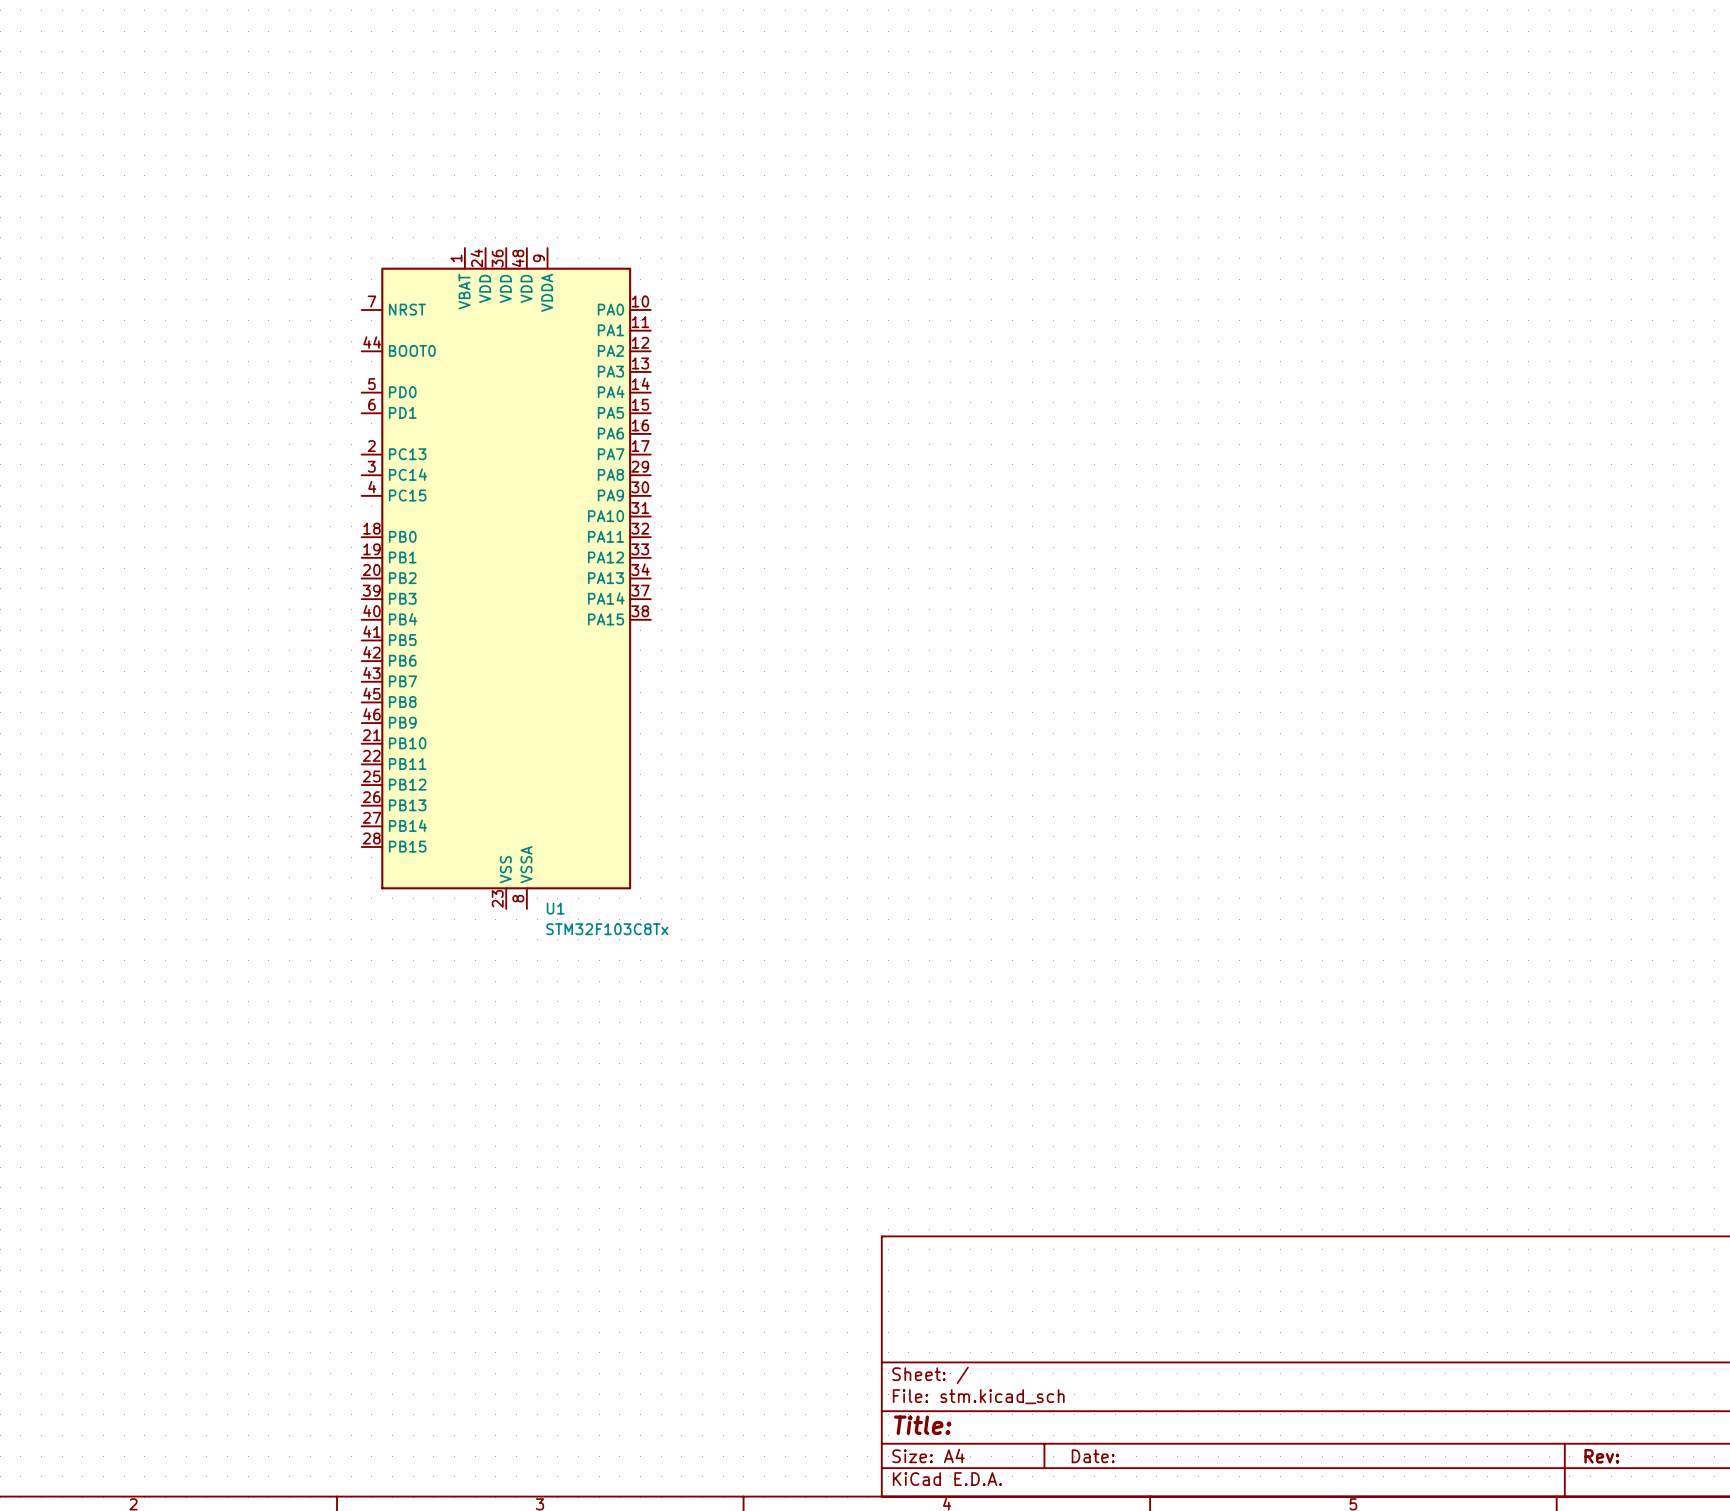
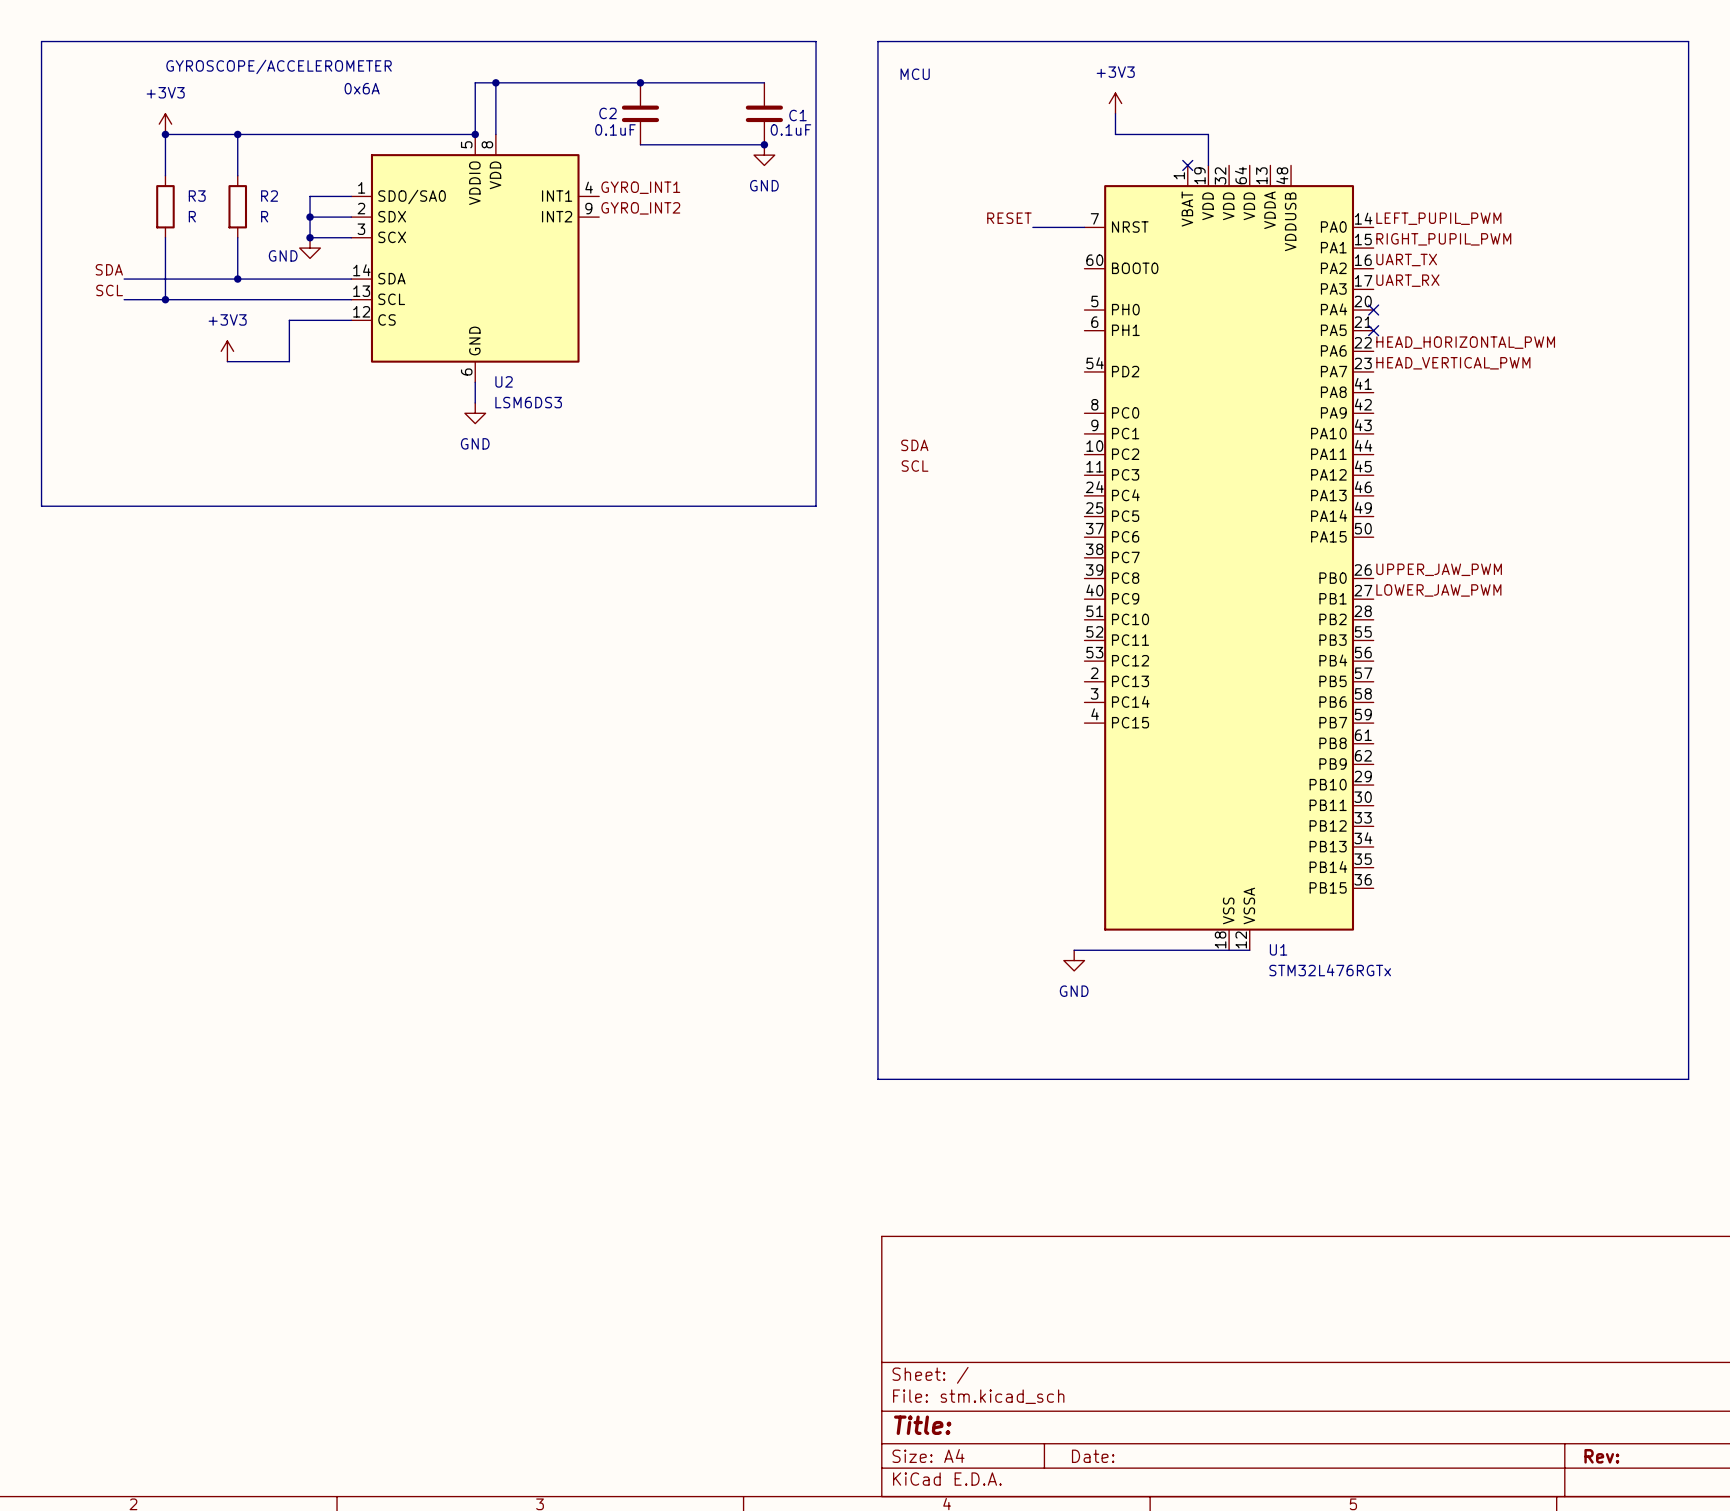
line: none -> (41, 41) (816, 41) (816, 506) (41, 506) (41, 41)
line: none -> (877, 41) (1688, 41) (1688, 1079) (877, 1079) (877, 41)
text: none -> GYROSCOPE/ACCELEROMETER (279, 66)
text: none -> MCU (915, 74)
wire: none -> (495, 82) (495, 134)
junction: none -> (495, 82)
junction: none -> (640, 82)
wire: none -> (764, 82) (475, 82) (475, 134) (165, 134) (165, 175)
text: none -> 0x6A (362, 88)
power symbol: none -> +3V3 (1115, 103)
C2: none -> 0.1uF (640, 113)
C1: none -> 0.1uF (764, 113)
wire: none -> (1115, 113) (1115, 134) (1208, 134) (1208, 165)
power symbol: none -> +3V3 (165, 124)
junction: none -> (165, 134)
wire: none -> (237, 134) (237, 175)
junction: none -> (237, 134)
junction: none -> (475, 134)
wire: none -> (640, 144) (764, 144)
junction: none -> (764, 144)
power symbol: none -> GND (764, 155)
no-connect mark: none -> (1187, 165)
label: none -> GYRO_INT1 (640, 187)
wire: none -> (351, 196) (310, 196) (310, 237) (351, 237)
R3: none -> R (165, 206)
R2: none -> R (237, 206)
label: none -> GYRO_INT2 (640, 208)
wire: none -> (310, 217) (351, 217)
junction: none -> (310, 217)
label: none -> RESET (1009, 218)
label: none -> LEFT_PUPIL_PWM (1438, 218)
wire: none -> (1032, 227) (1084, 227)
wire: none -> (165, 237) (165, 299)
wire: none -> (237, 237) (237, 279)
junction: none -> (310, 237)
label: none -> RIGHT_PUPIL_PWM (1443, 239)
power symbol: none -> GND (310, 248)
U1 symbol: [361, 248, 651, 909] -> [1084, 165, 1374, 951]
U2: none -> LSM6DS3 (475, 258)
label: none -> UART_TX (1406, 259)
label: none -> SDA (109, 269)
wire: none -> (124, 279) (351, 279)
junction: none -> (237, 279)
label: none -> UART_RX (1407, 280)
label: none -> SCL (109, 290)
wire: none -> (124, 299) (351, 299)
junction: none -> (165, 299)
no-connect mark: none -> (1373, 310)
wire: none -> (351, 320) (289, 320) (289, 361) (227, 361)
no-connect mark: none -> (1373, 330)
label: none -> HEAD_HORIZONTAL_PWM (1465, 342)
power symbol: none -> +3V3 (227, 351)
label: none -> HEAD_VERTICAL_PWM (1453, 363)
power symbol: none -> GND (475, 413)
label: none -> SDA (914, 445)
label: none -> SCL (915, 466)
label: none -> UPPER_JAW_PWM (1439, 569)
label: none -> LOWER_JAW_PWM (1438, 590)
U1 name position: U1 (555, 908) -> U1 (1278, 949)
U1 value: STM32F103C8Tx (607, 929) -> STM32L476RGTx (1330, 970)
wire: none -> (1074, 950) (1249, 950)
power symbol: none -> GND (1074, 960)

